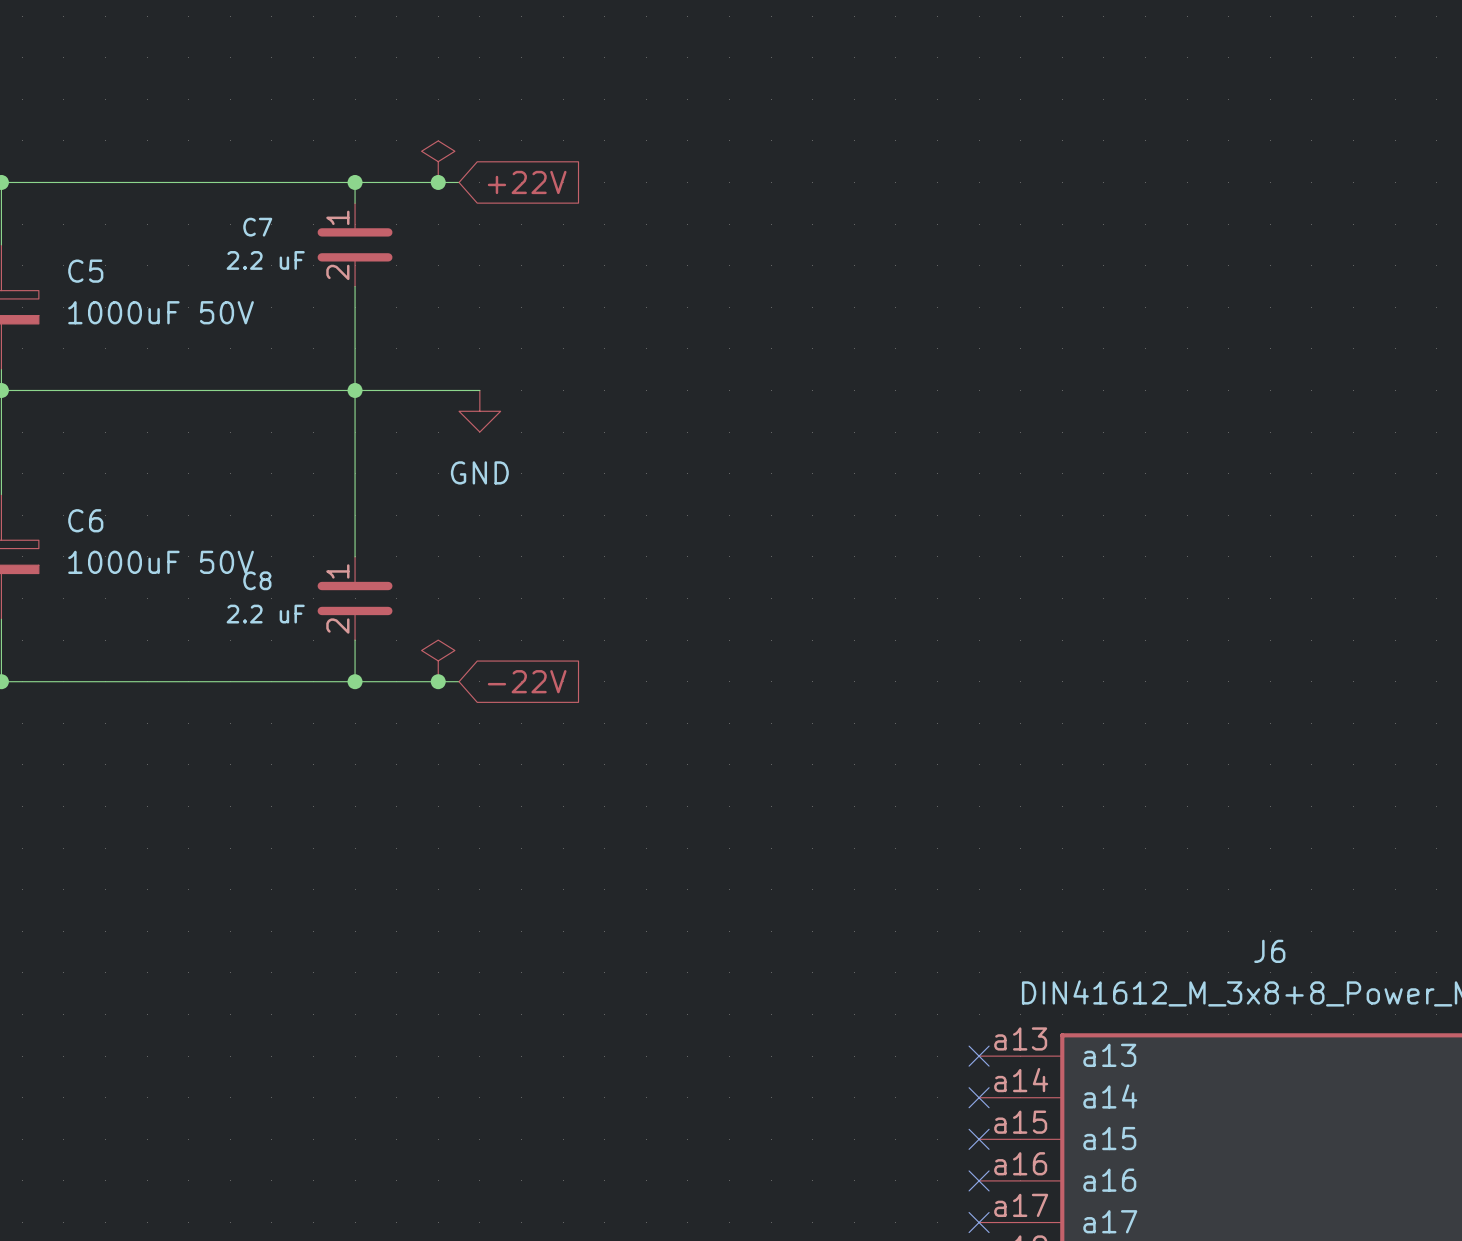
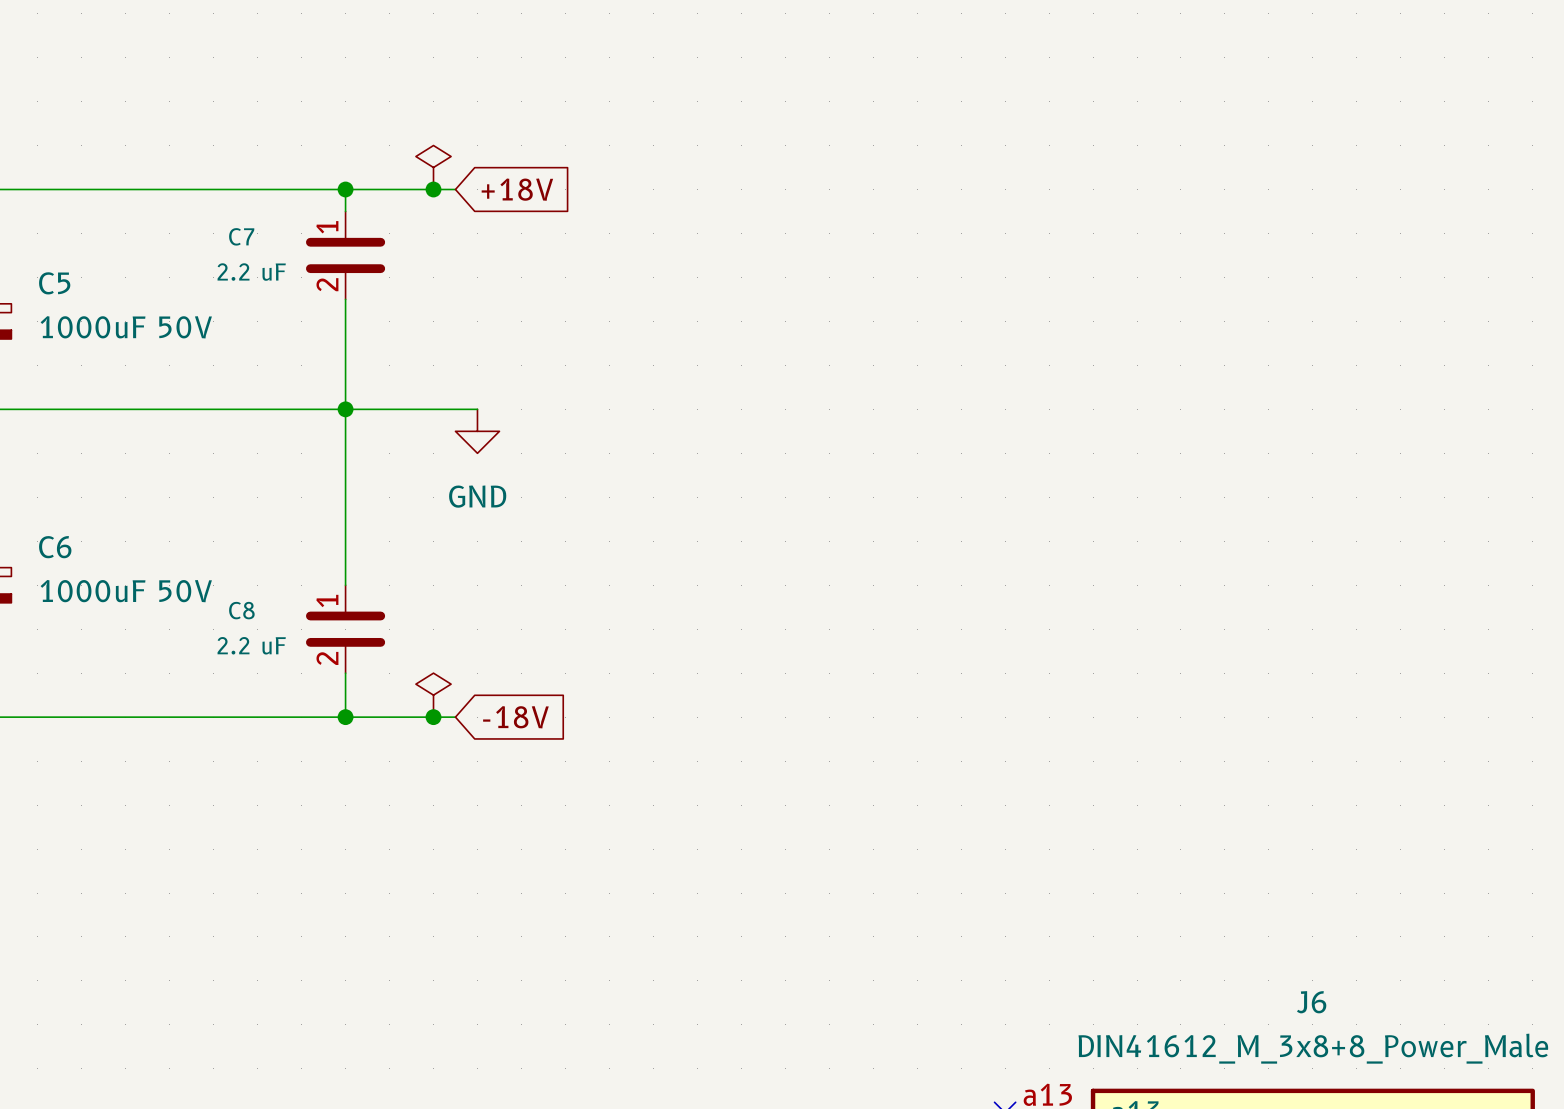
global label: +22V (527, 182) -> +18V (517, 189)
global label: -22V (527, 681) -> -18V (515, 717)

